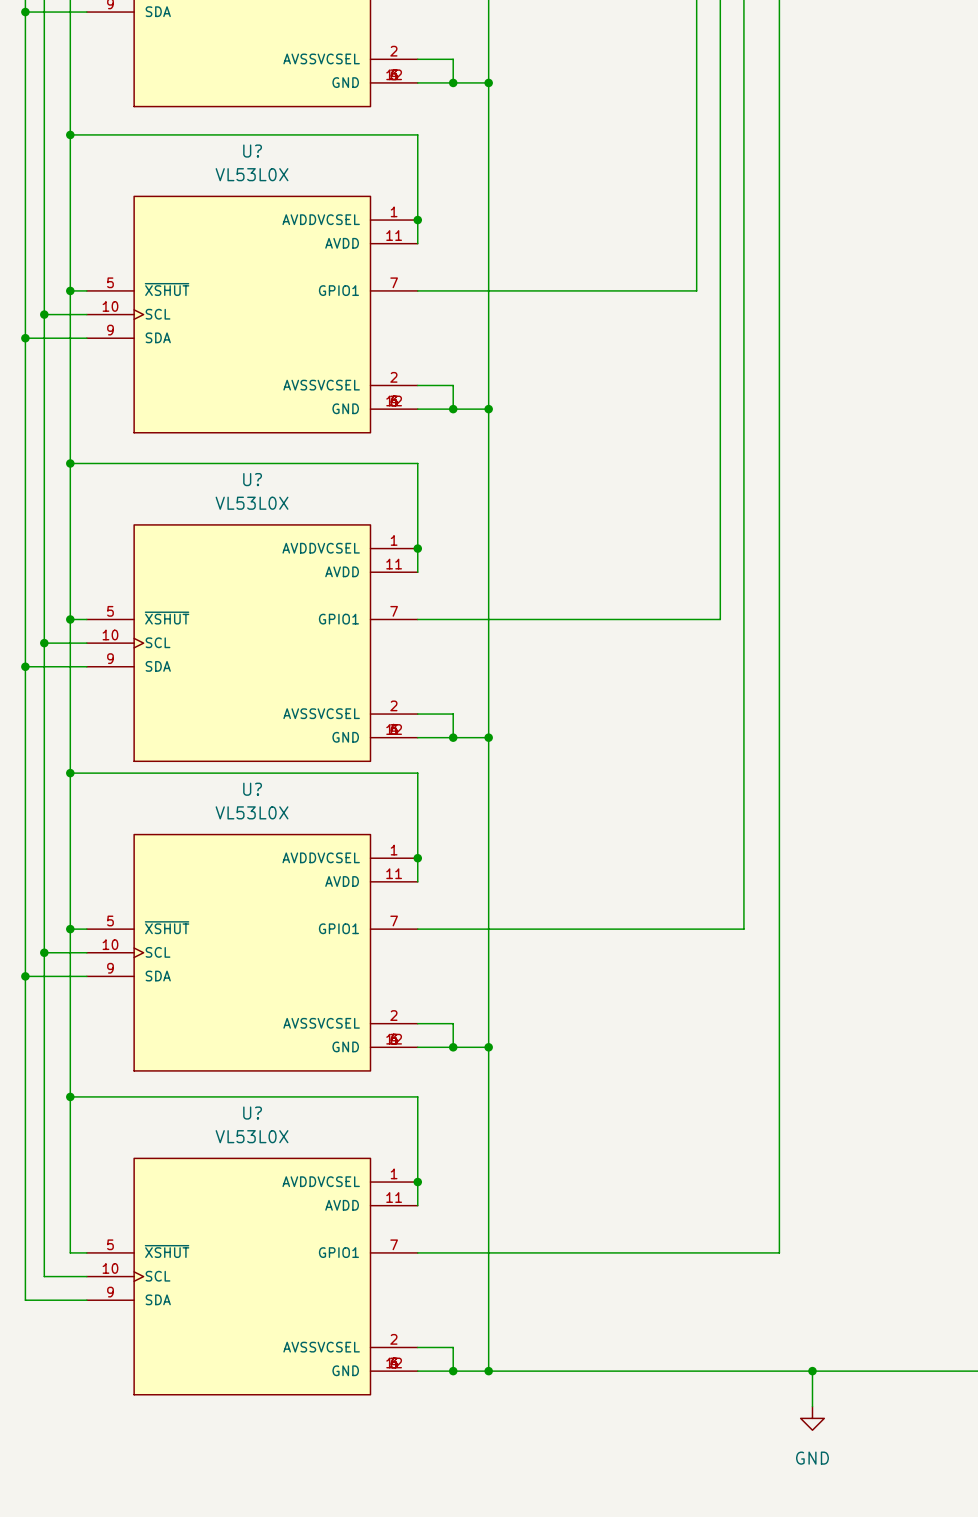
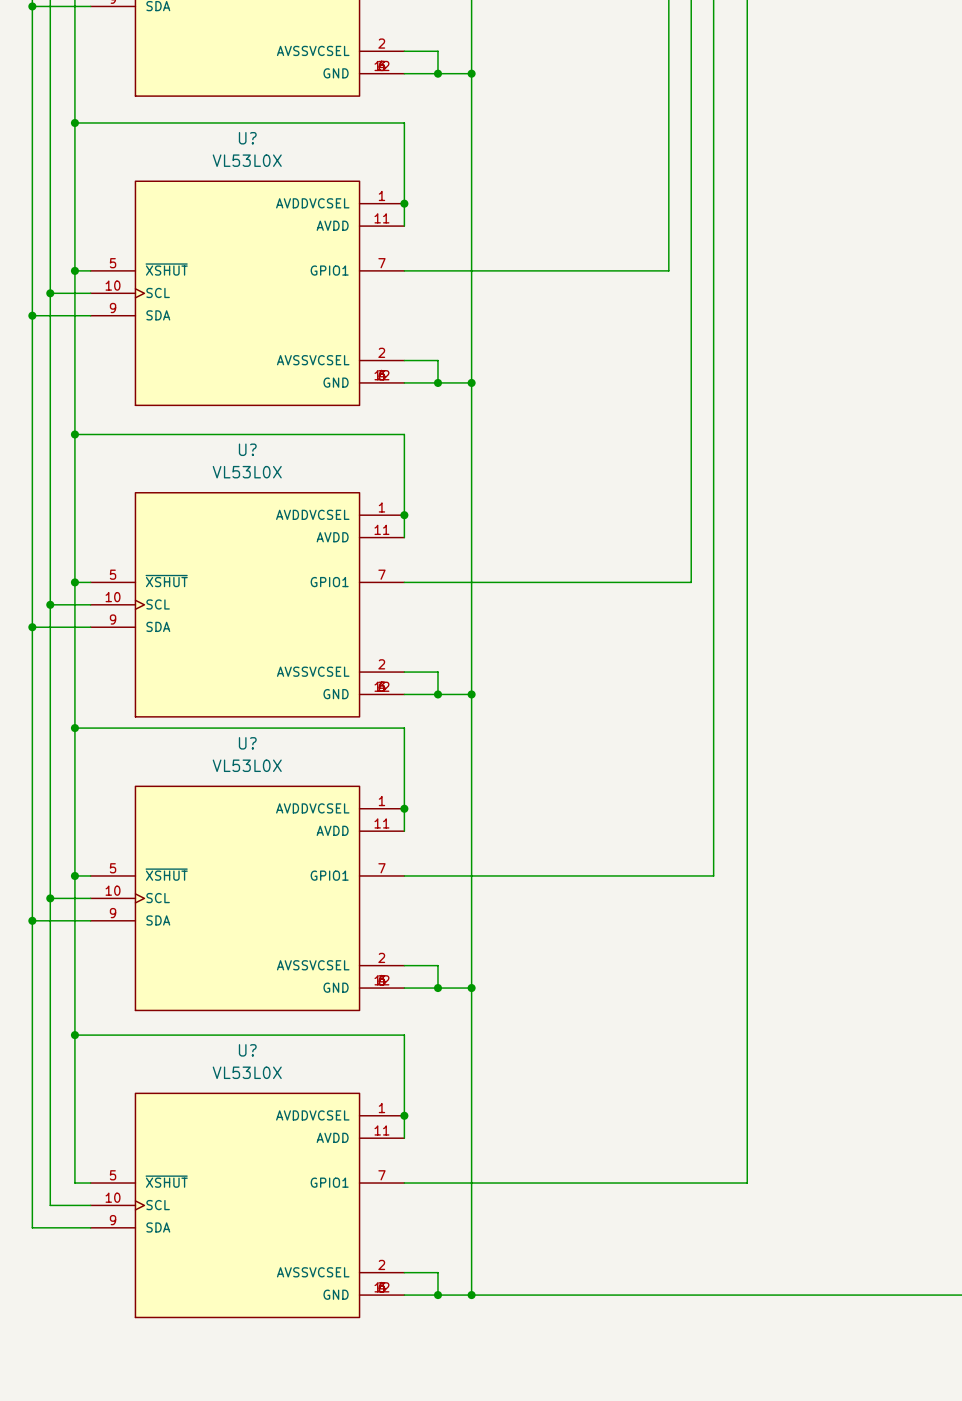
wire: (812, 1371) (812, 1406) -> none
junction: (812, 1371) -> none
power symbol: GND (812, 1418) -> none

